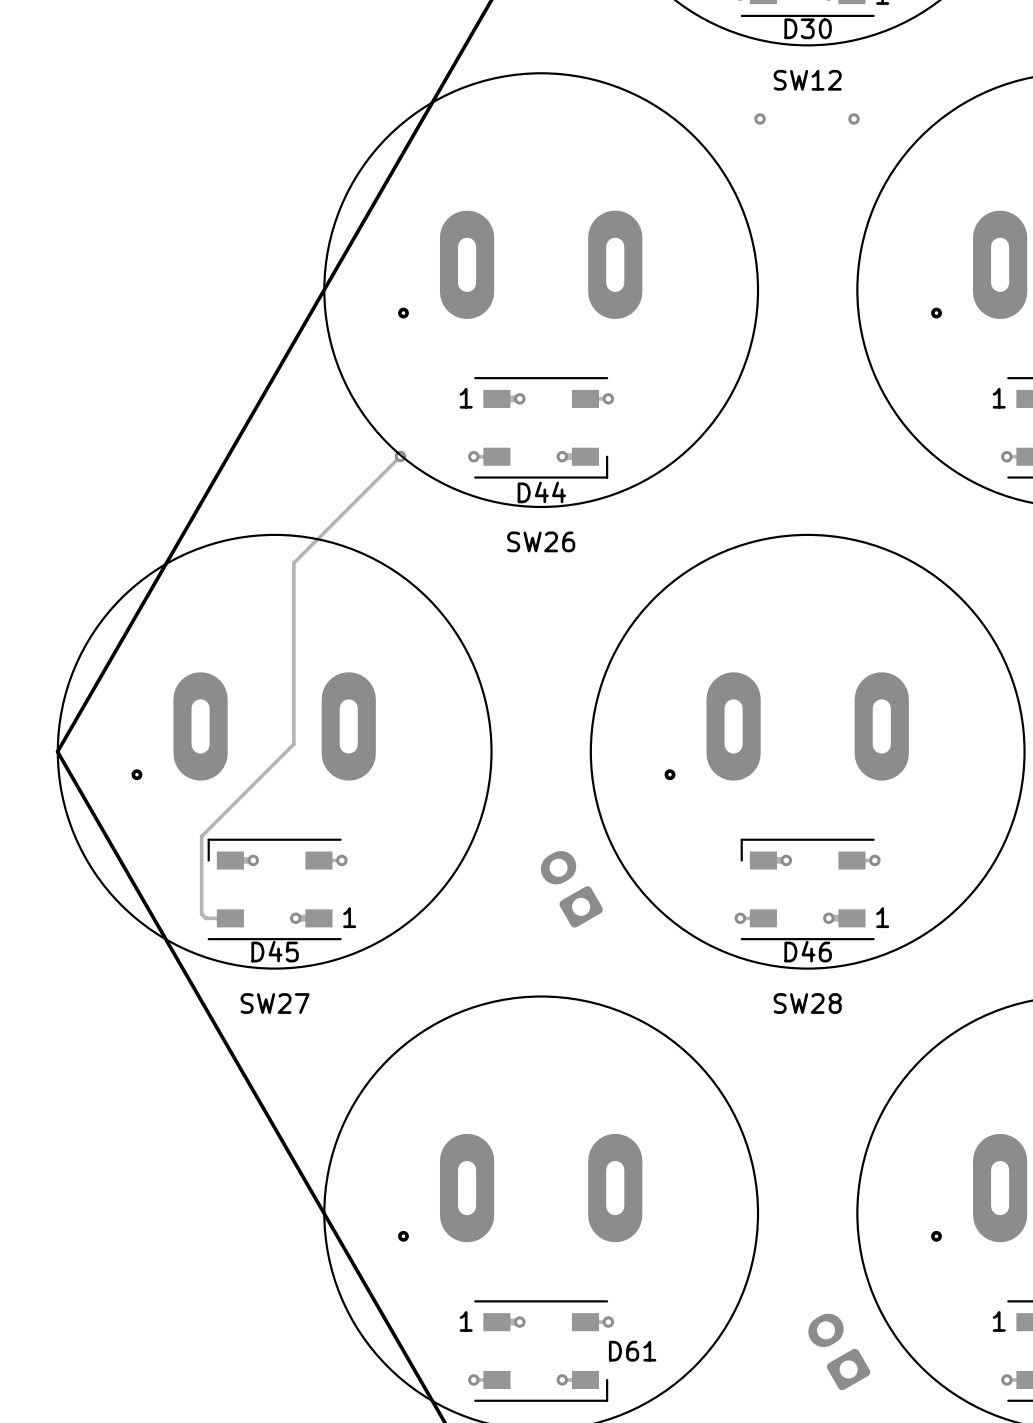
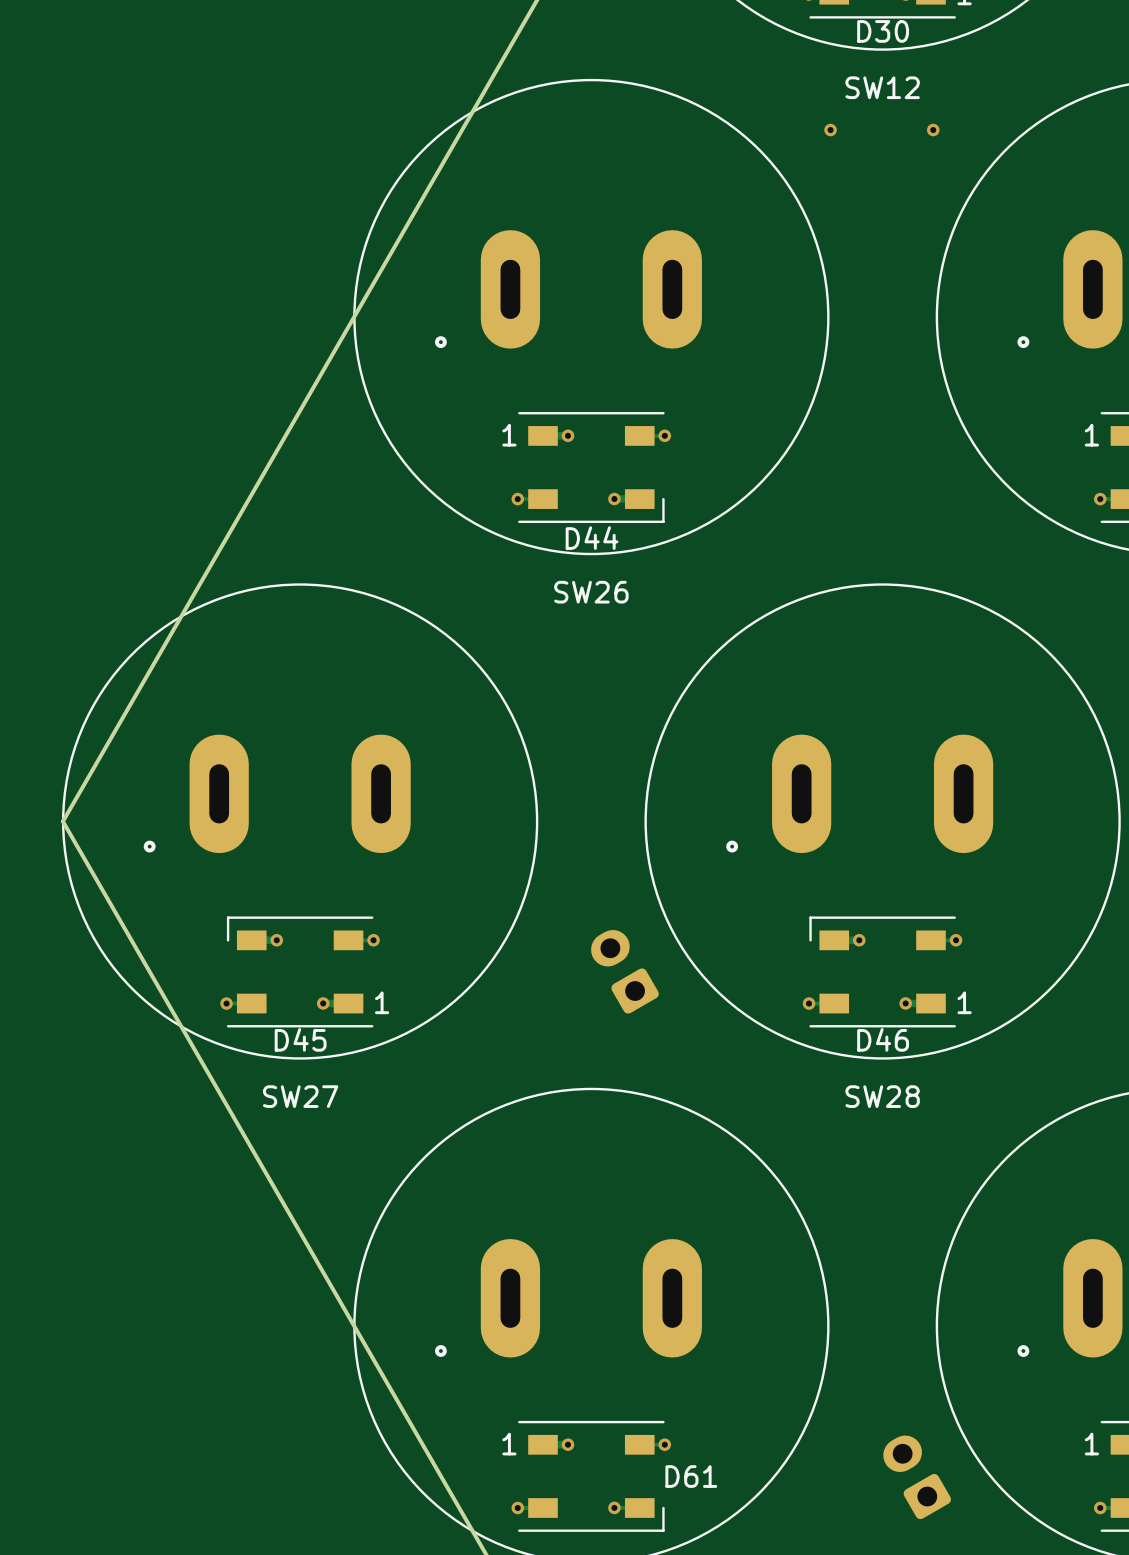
track: (400, 456) (293, 563) (293, 744) (201, 836) (201, 914) (207, 918) -> none
via: (400, 456) -> none
via: none -> (226, 1003)

